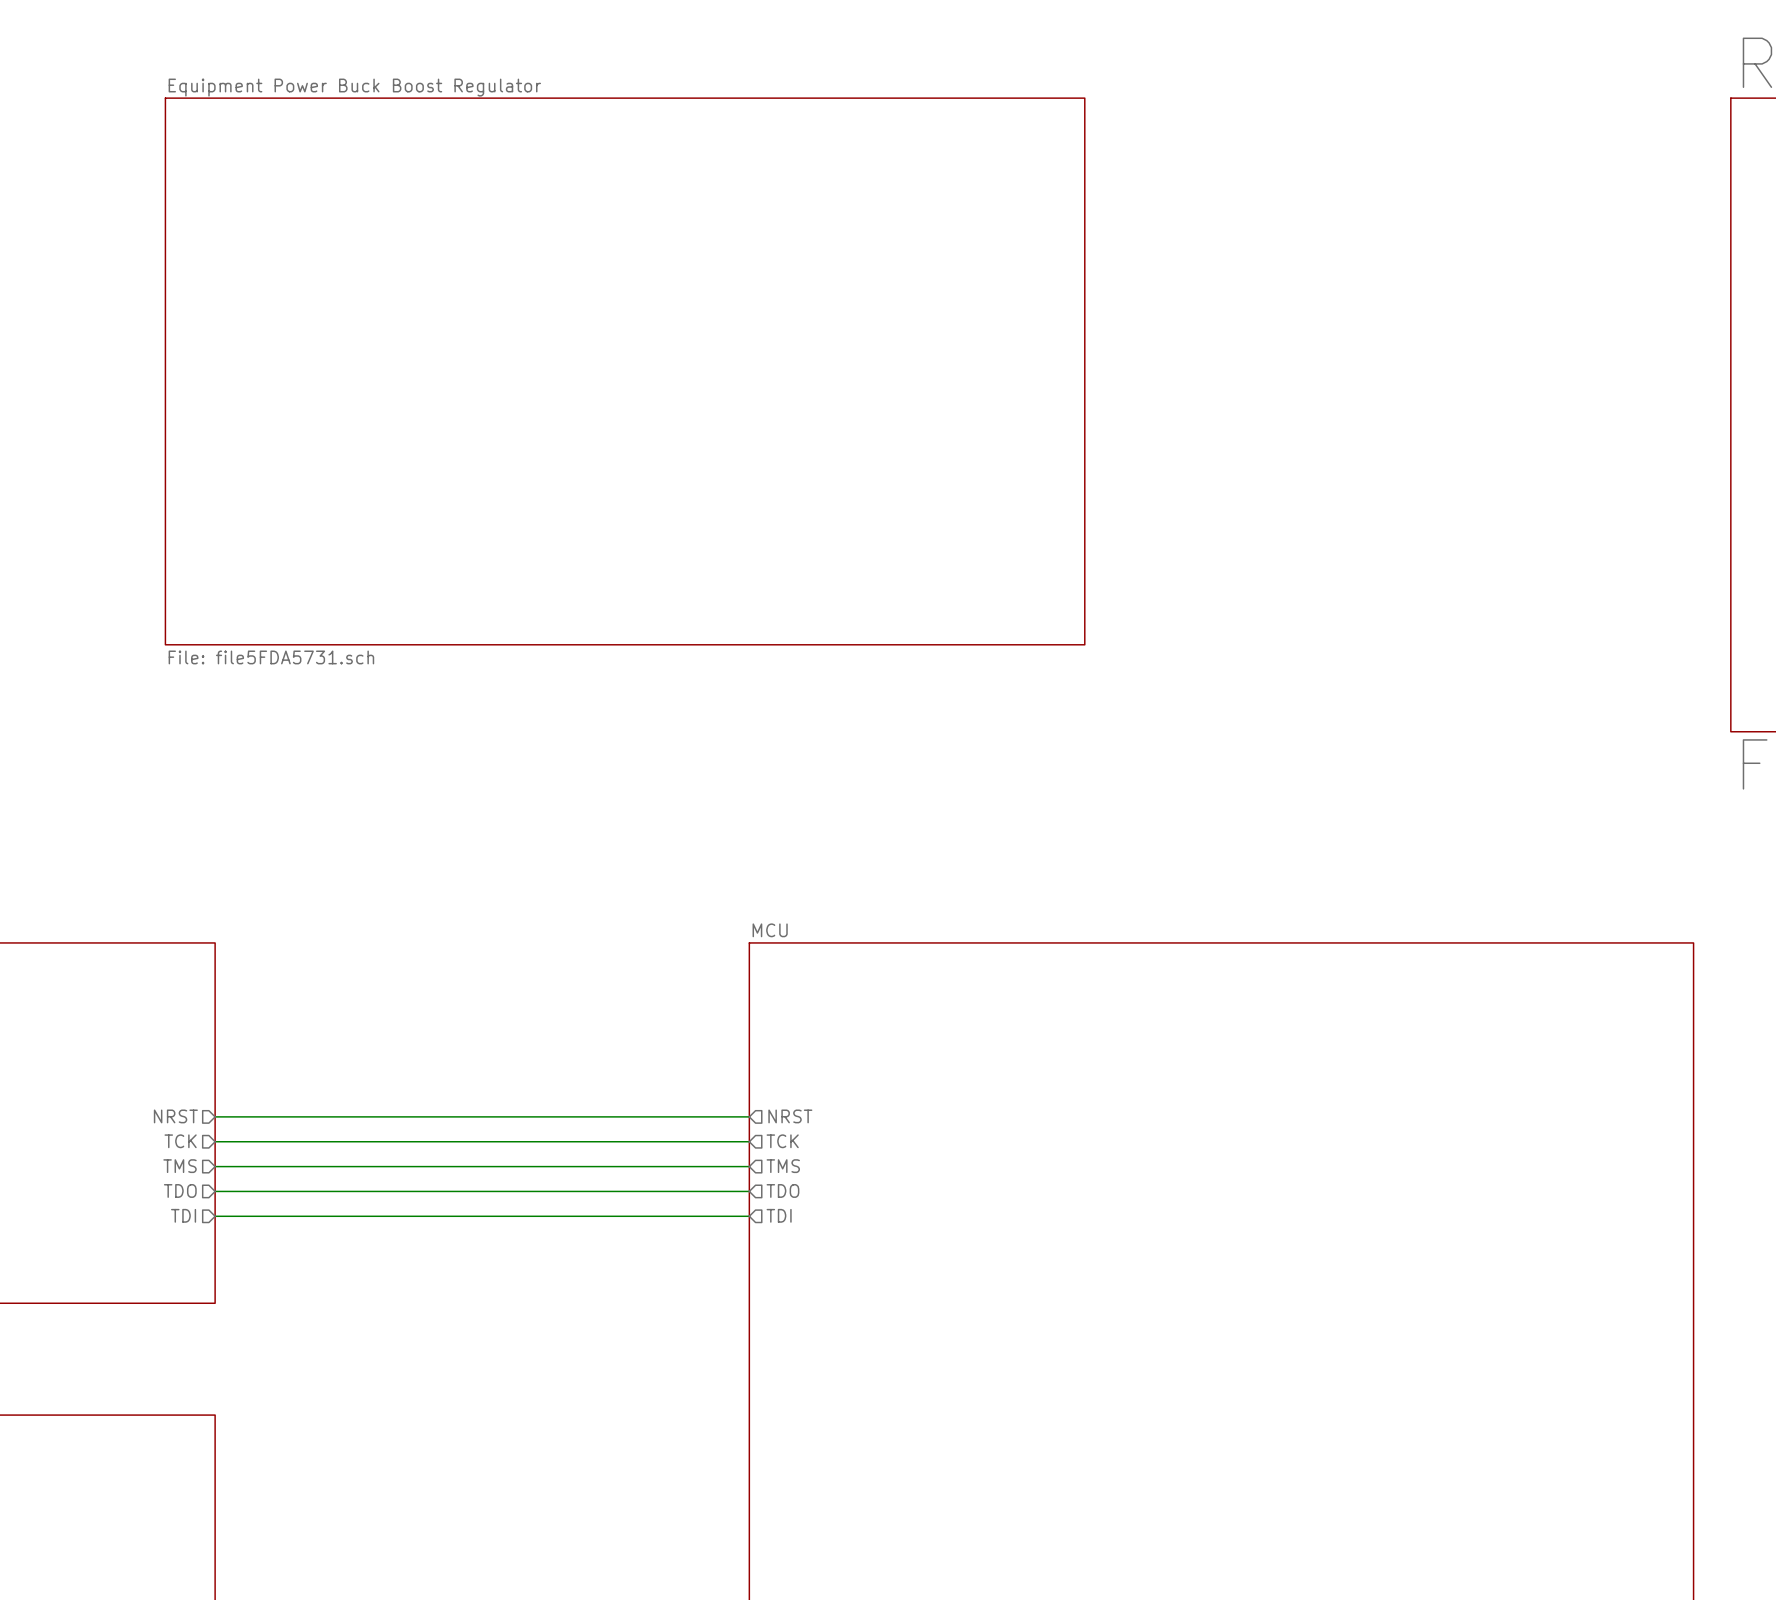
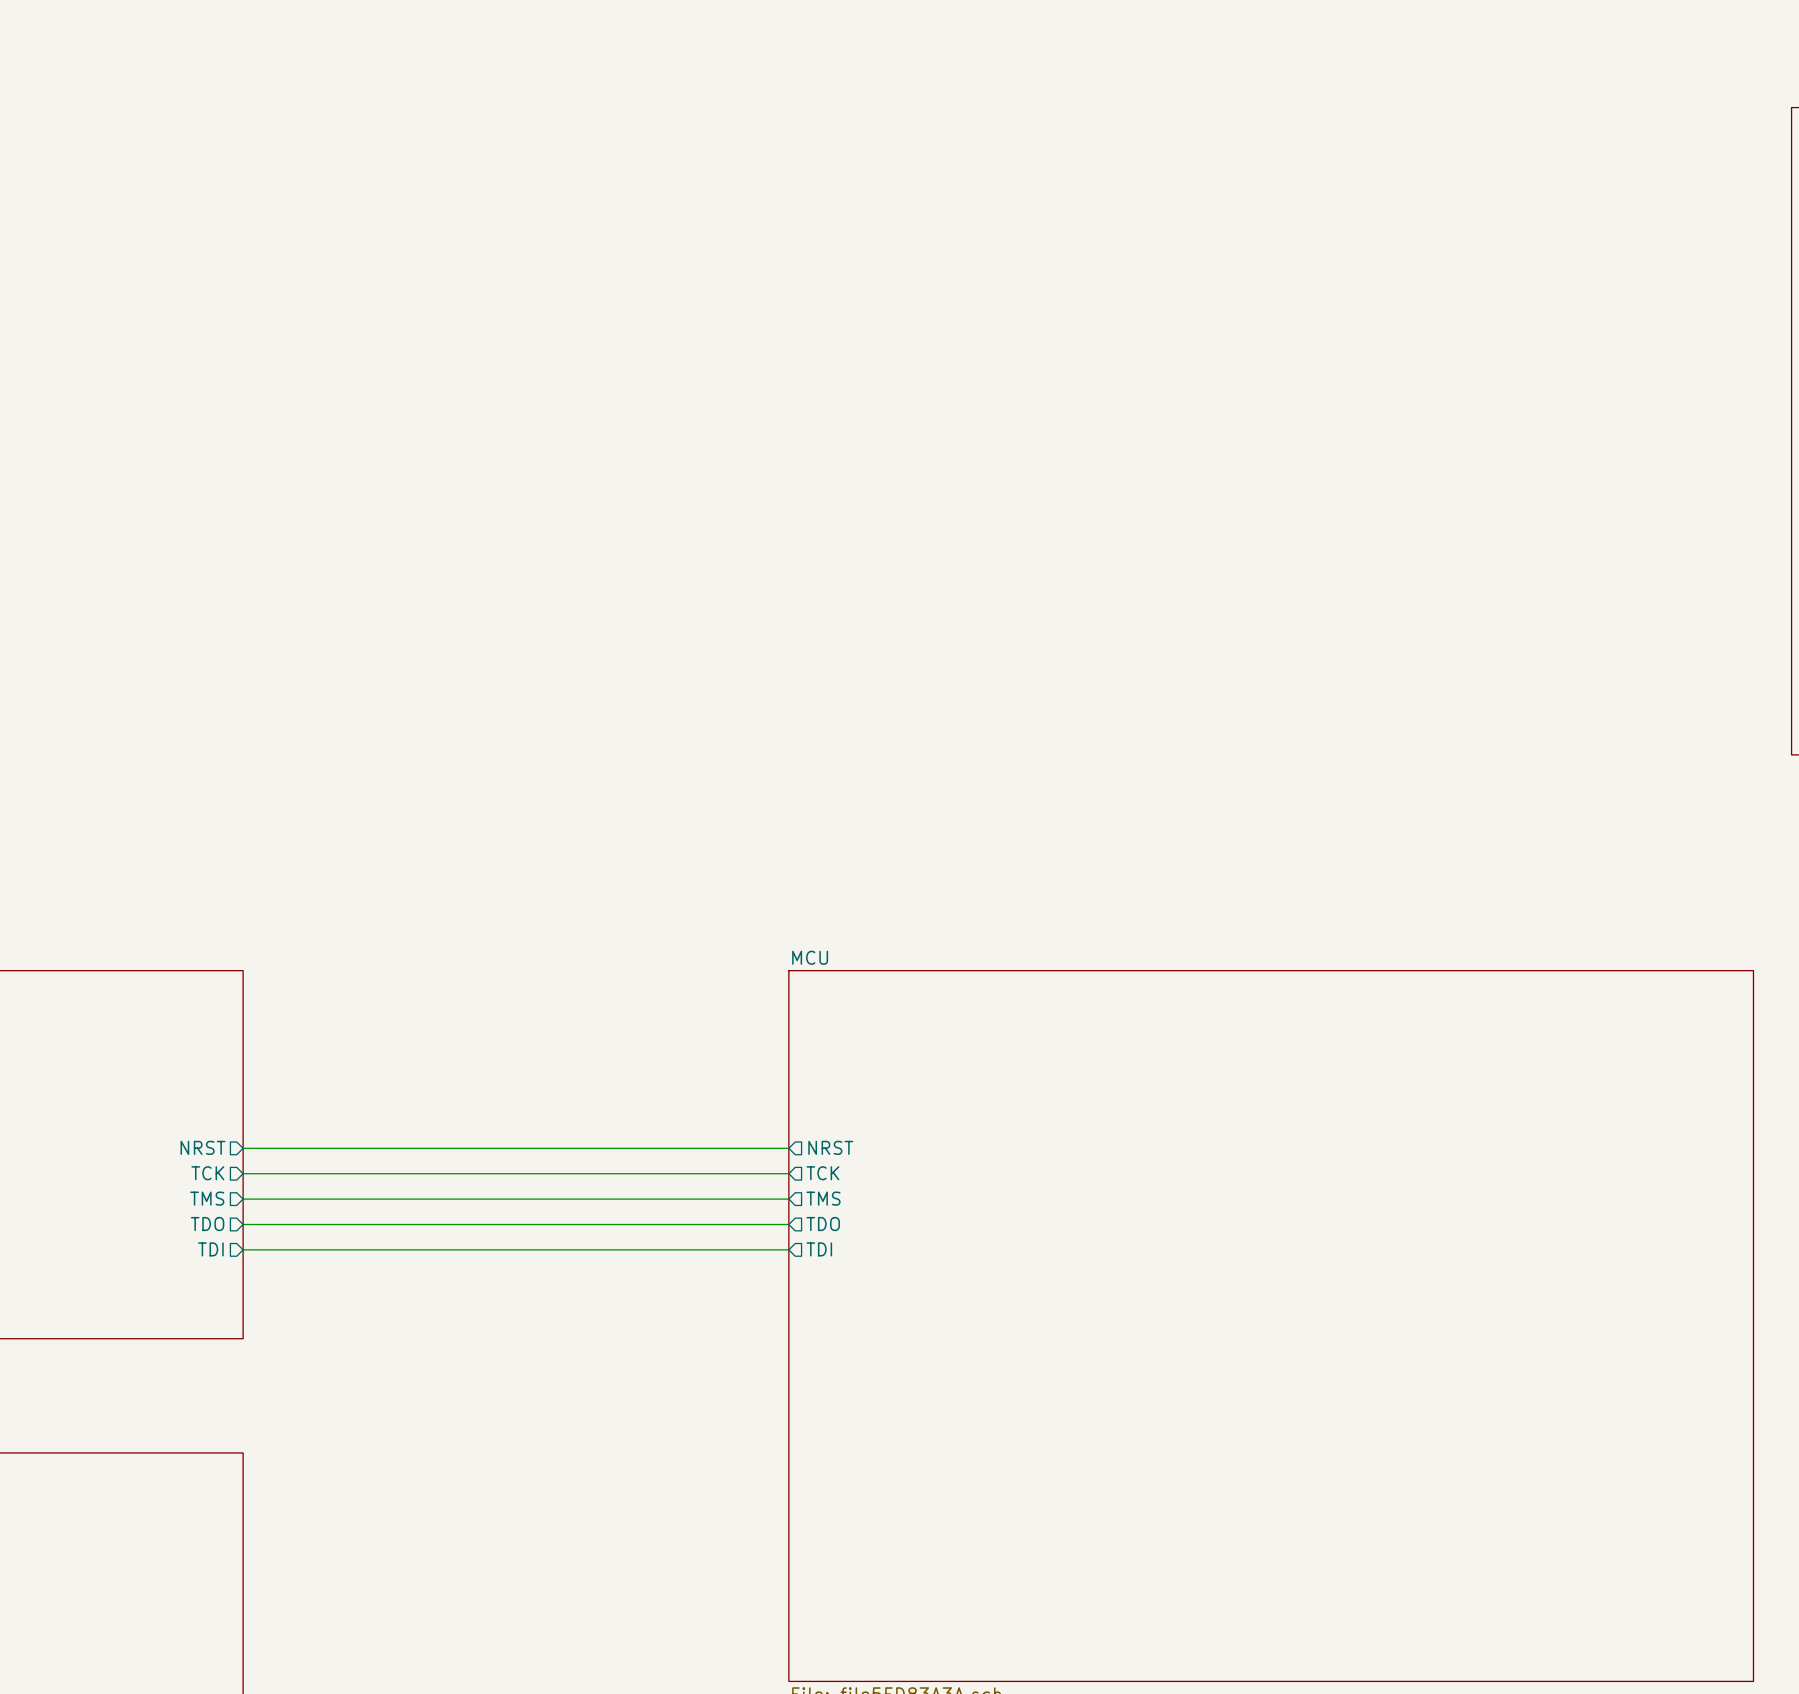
sheet Equipment Power Buck Boost Regulator: File: file5FDA5731.sch (625, 371) -> none

